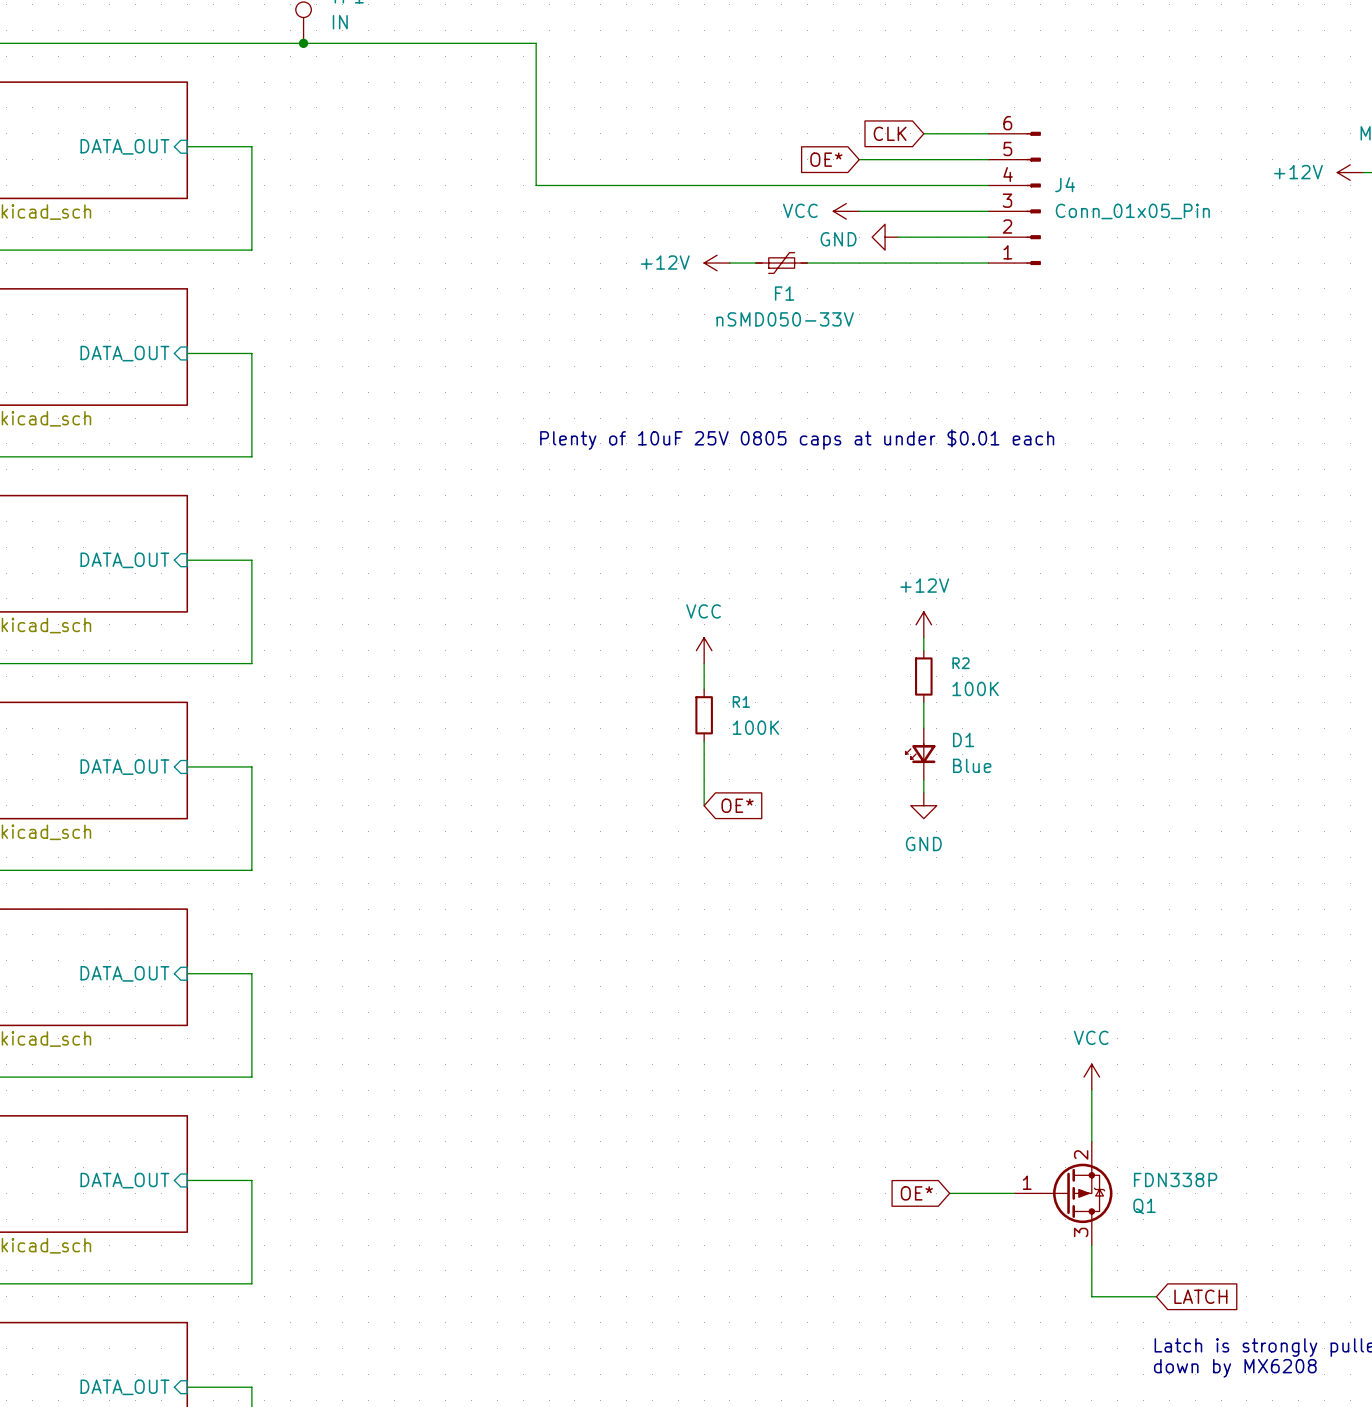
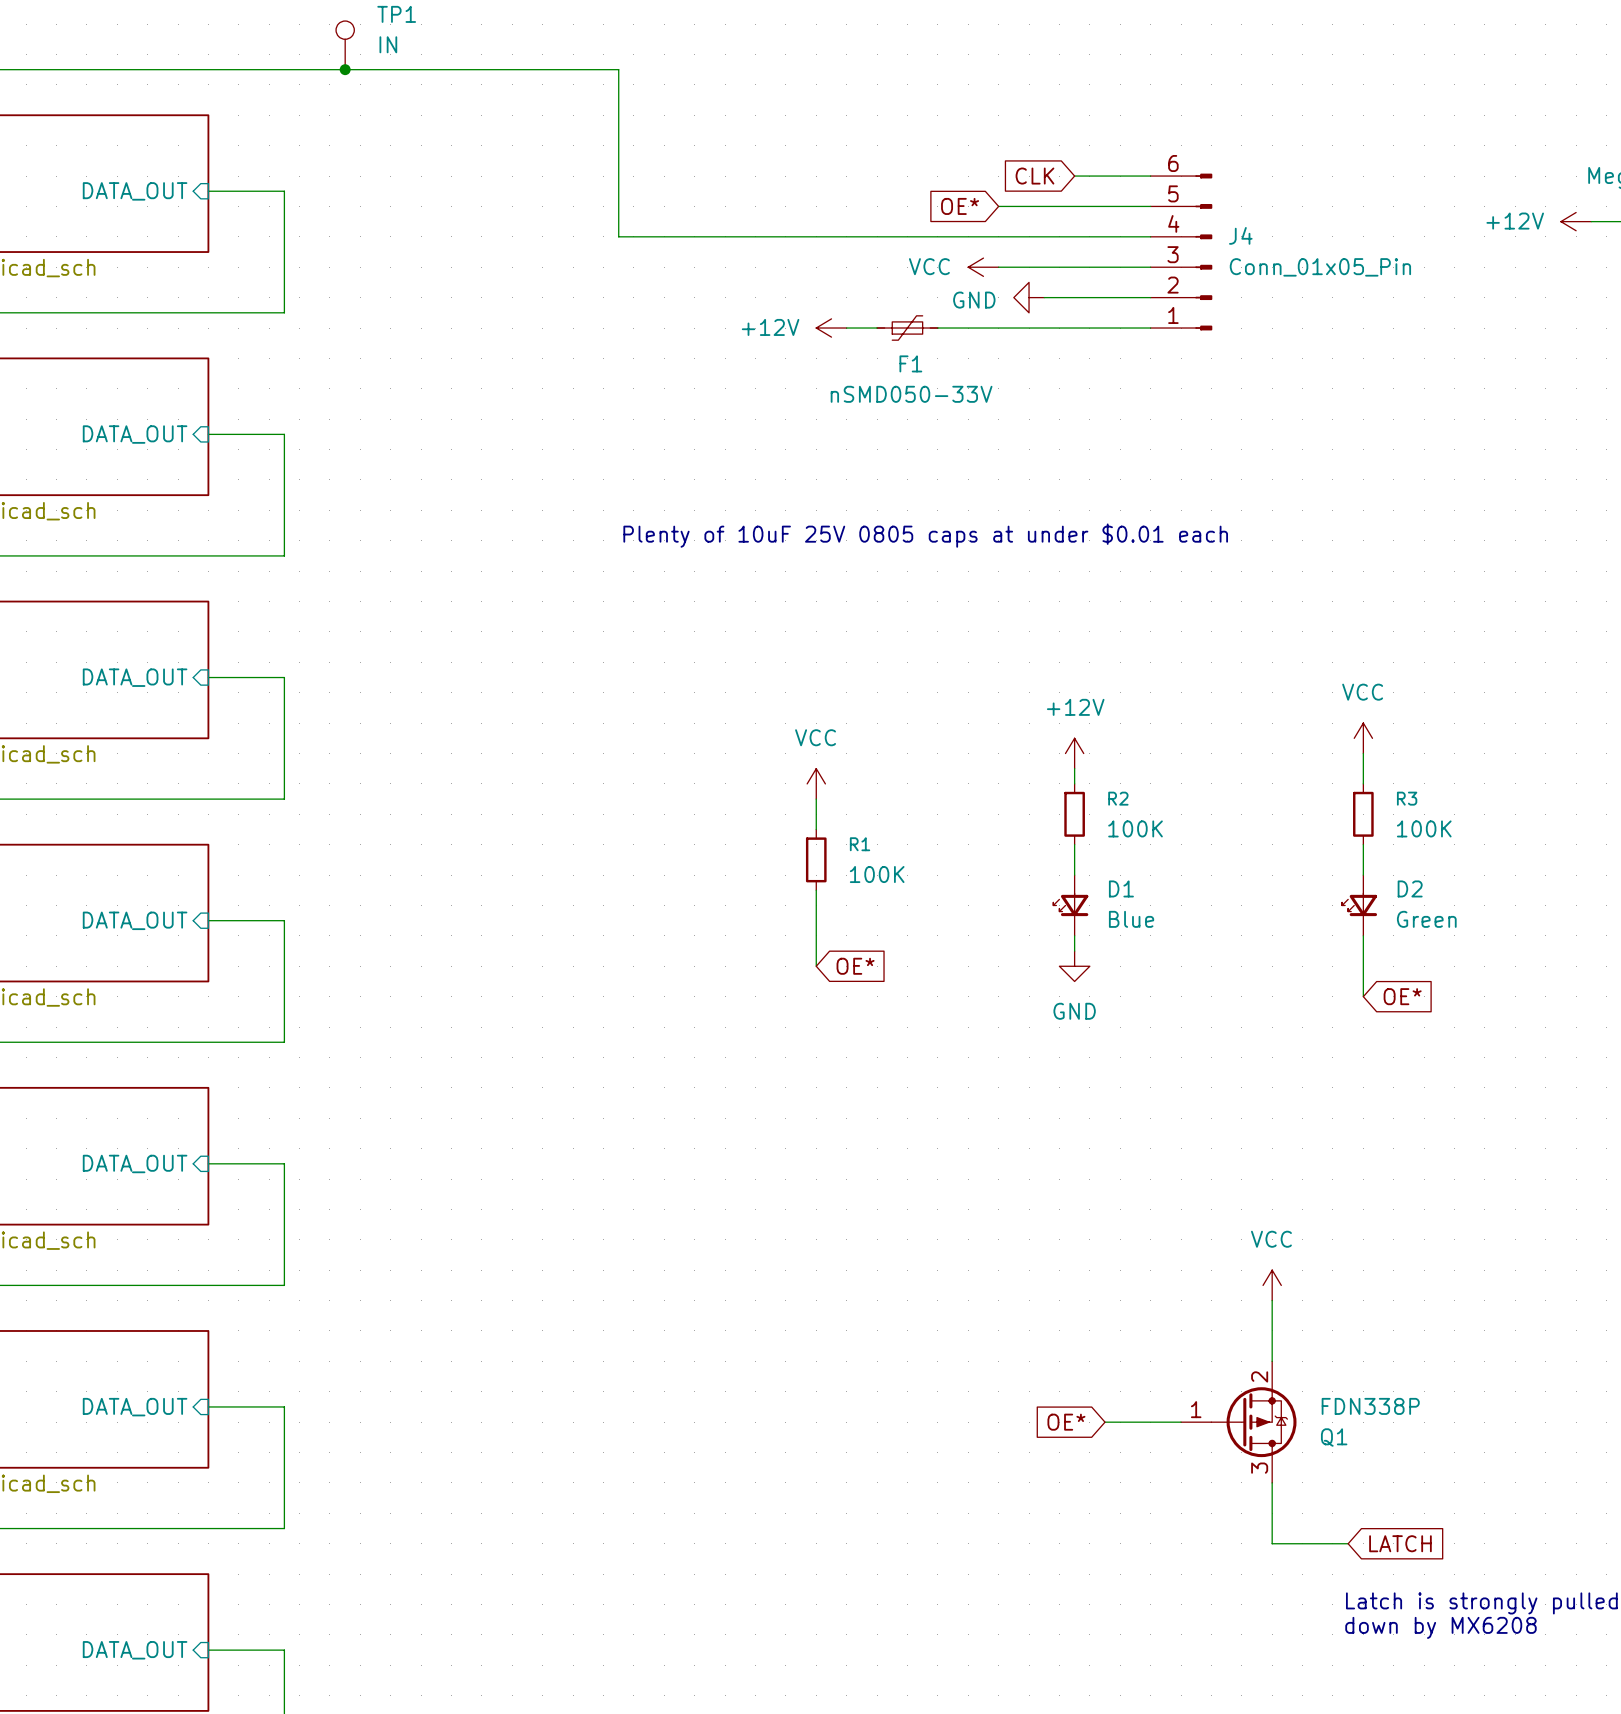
power symbol: none -> VCC (1363, 738)
wire: none -> (1363, 753) (1363, 783)
R3: none -> 100K (1363, 814)
wire: none -> (1363, 844) (1363, 875)
D2: none -> Green (1359, 905)
wire: none -> (1363, 935) (1363, 996)
global label: none -> OE* (1402, 996)

